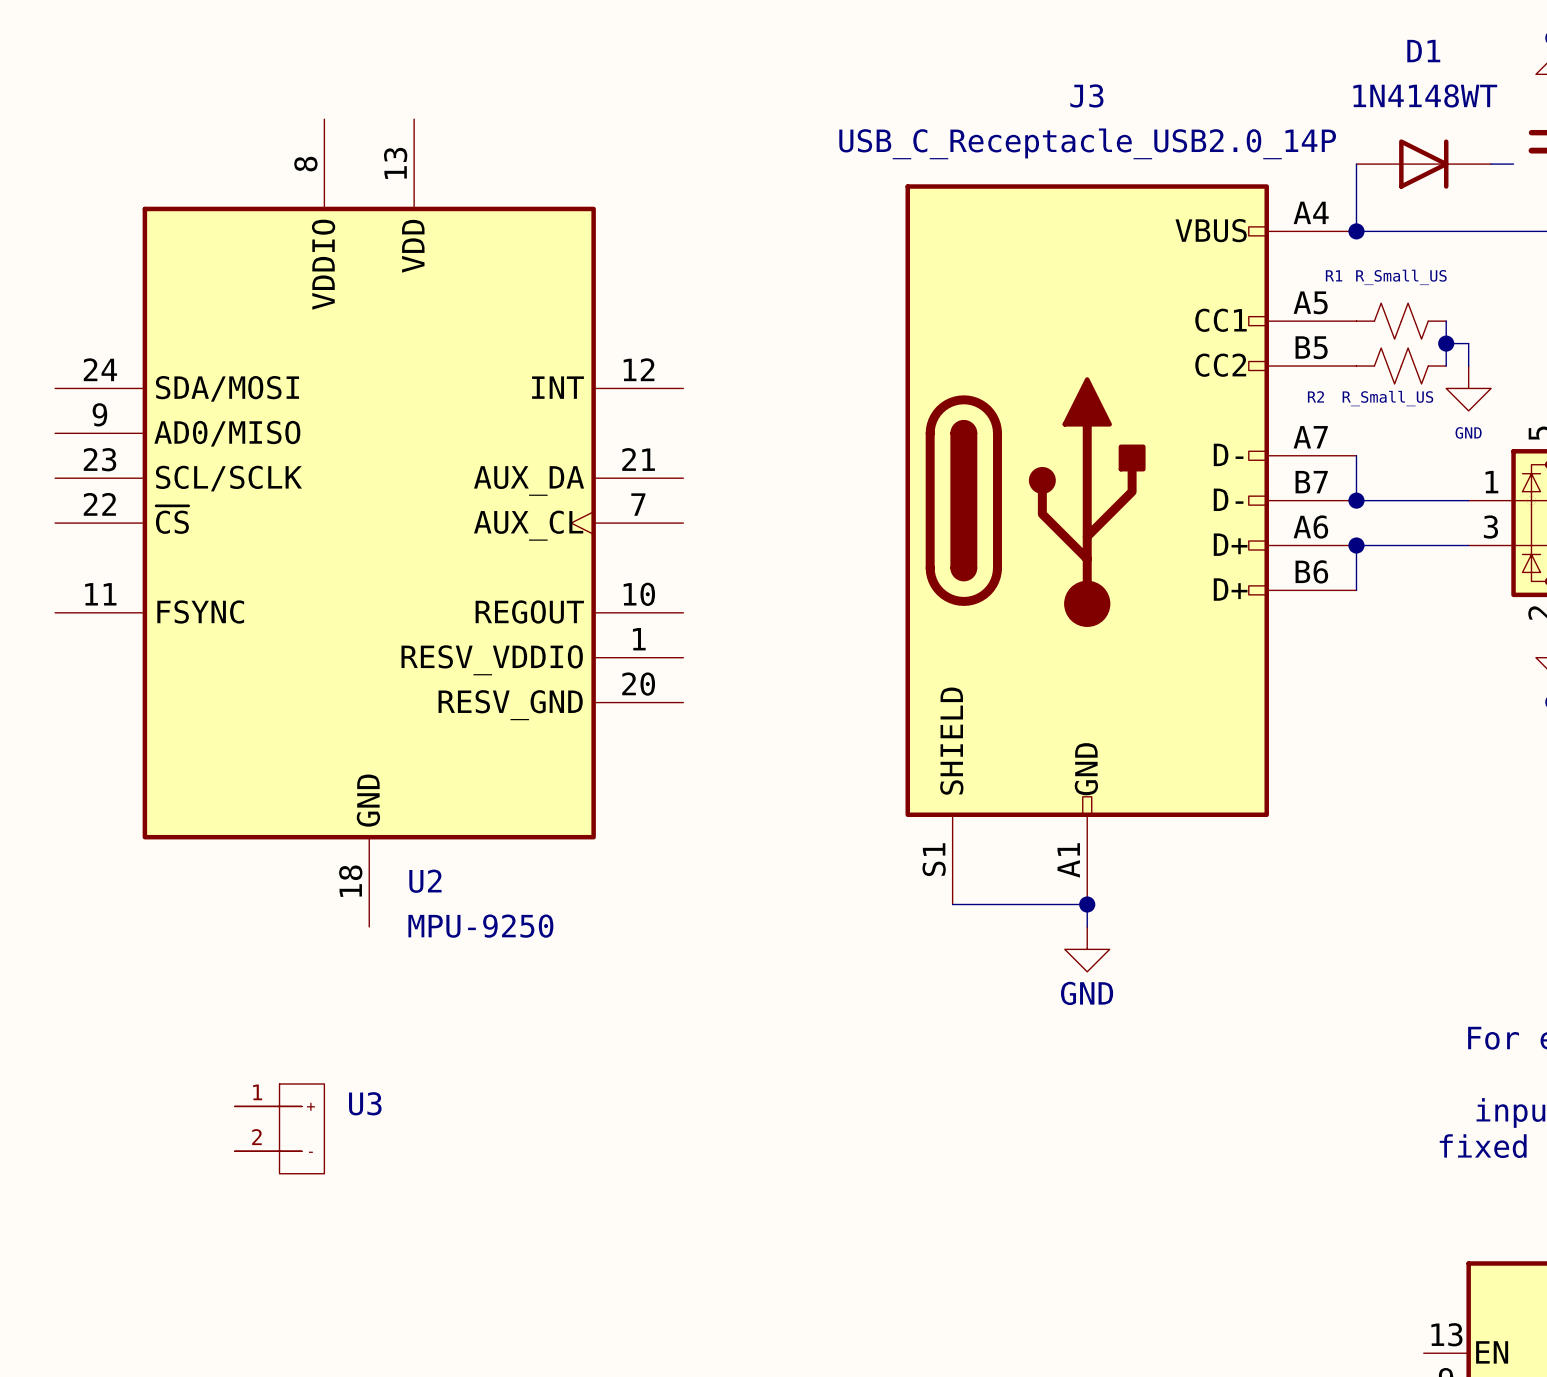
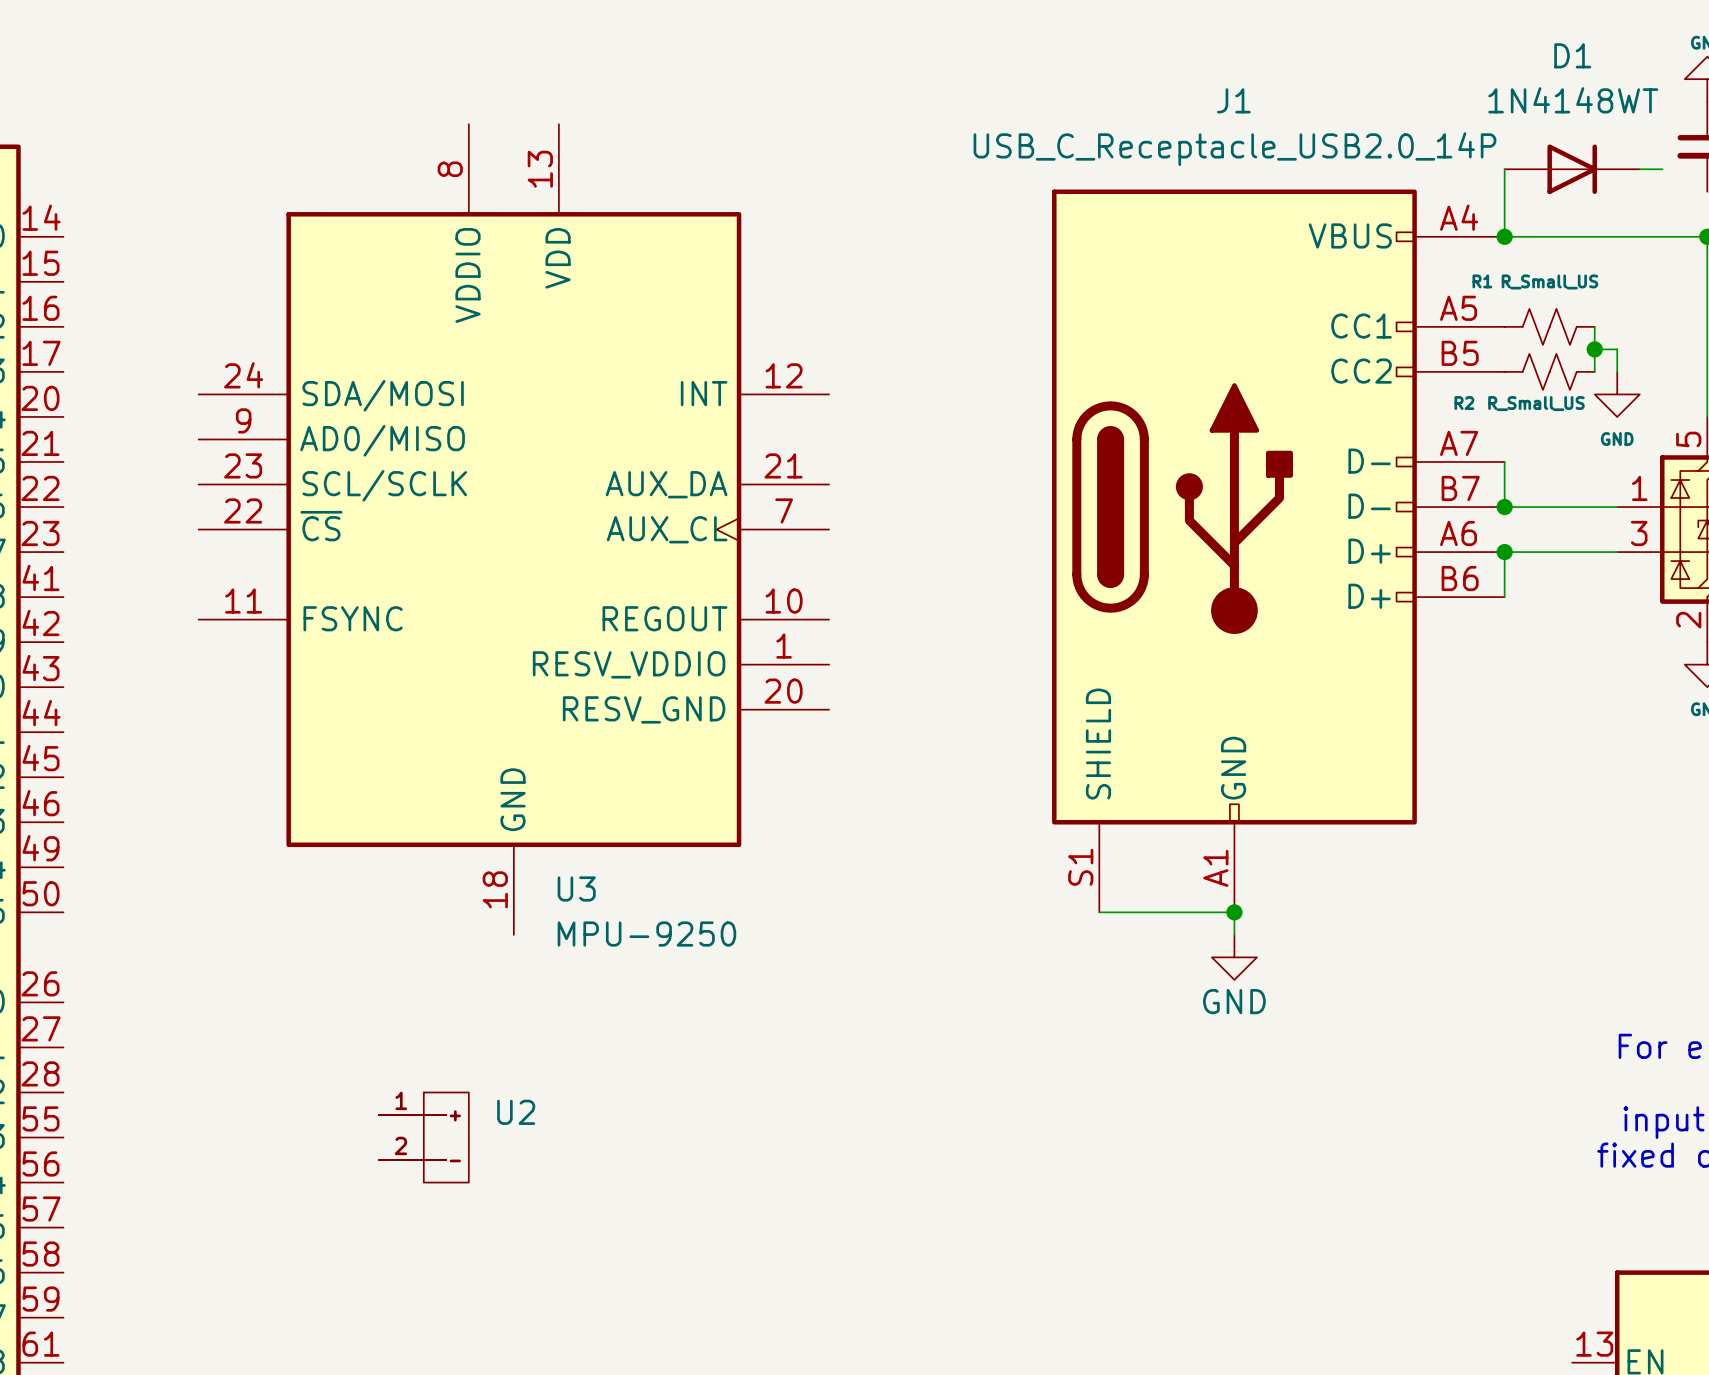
J3 name: J3 (1086, 95) -> J1 (1233, 100)
U2 name: U2 (425, 881) -> U3 (576, 888)
U3 name: U3 (365, 1103) -> U2 (516, 1112)

